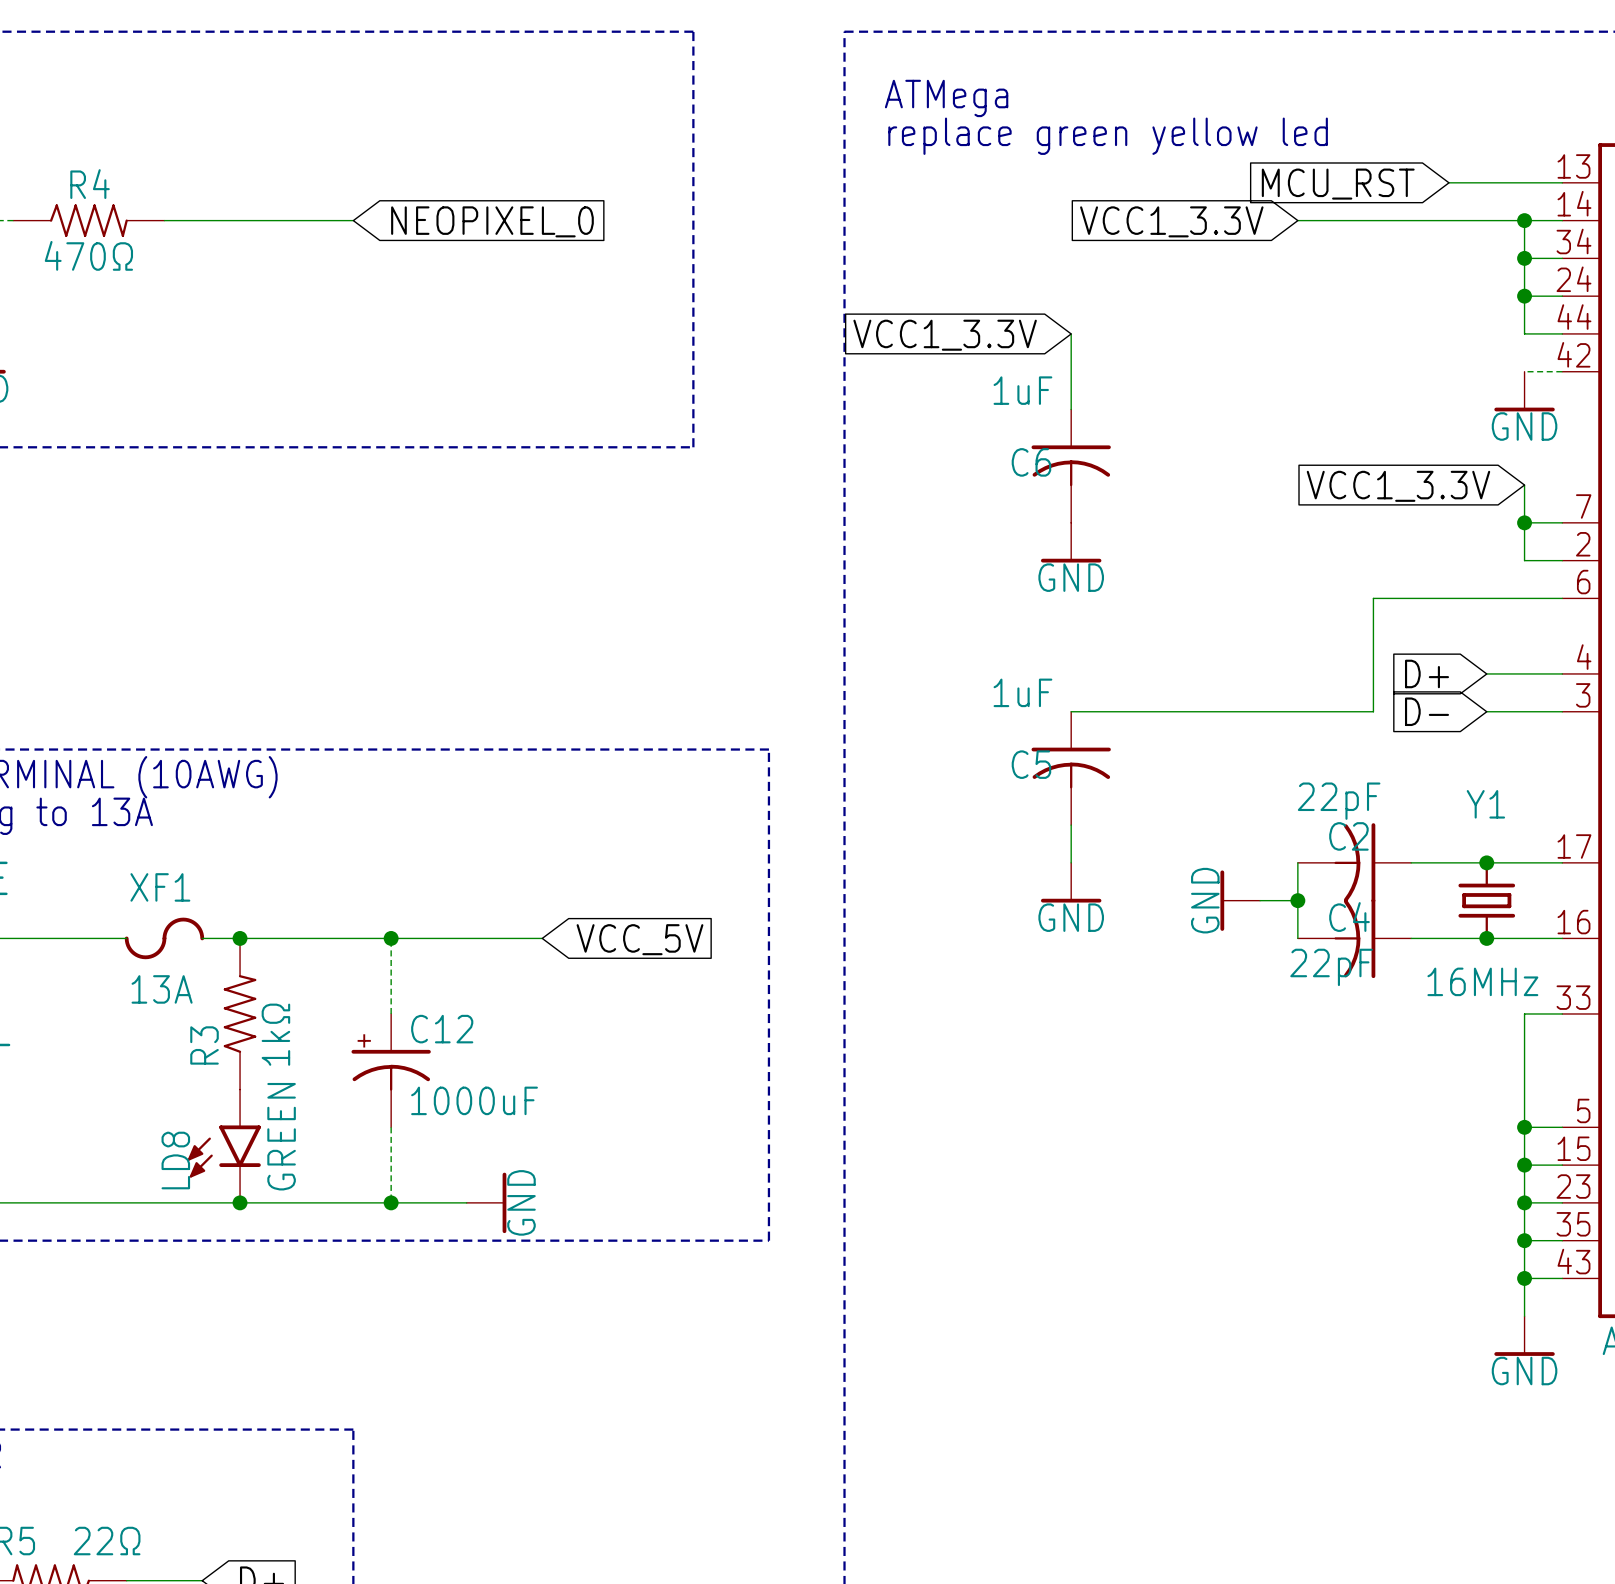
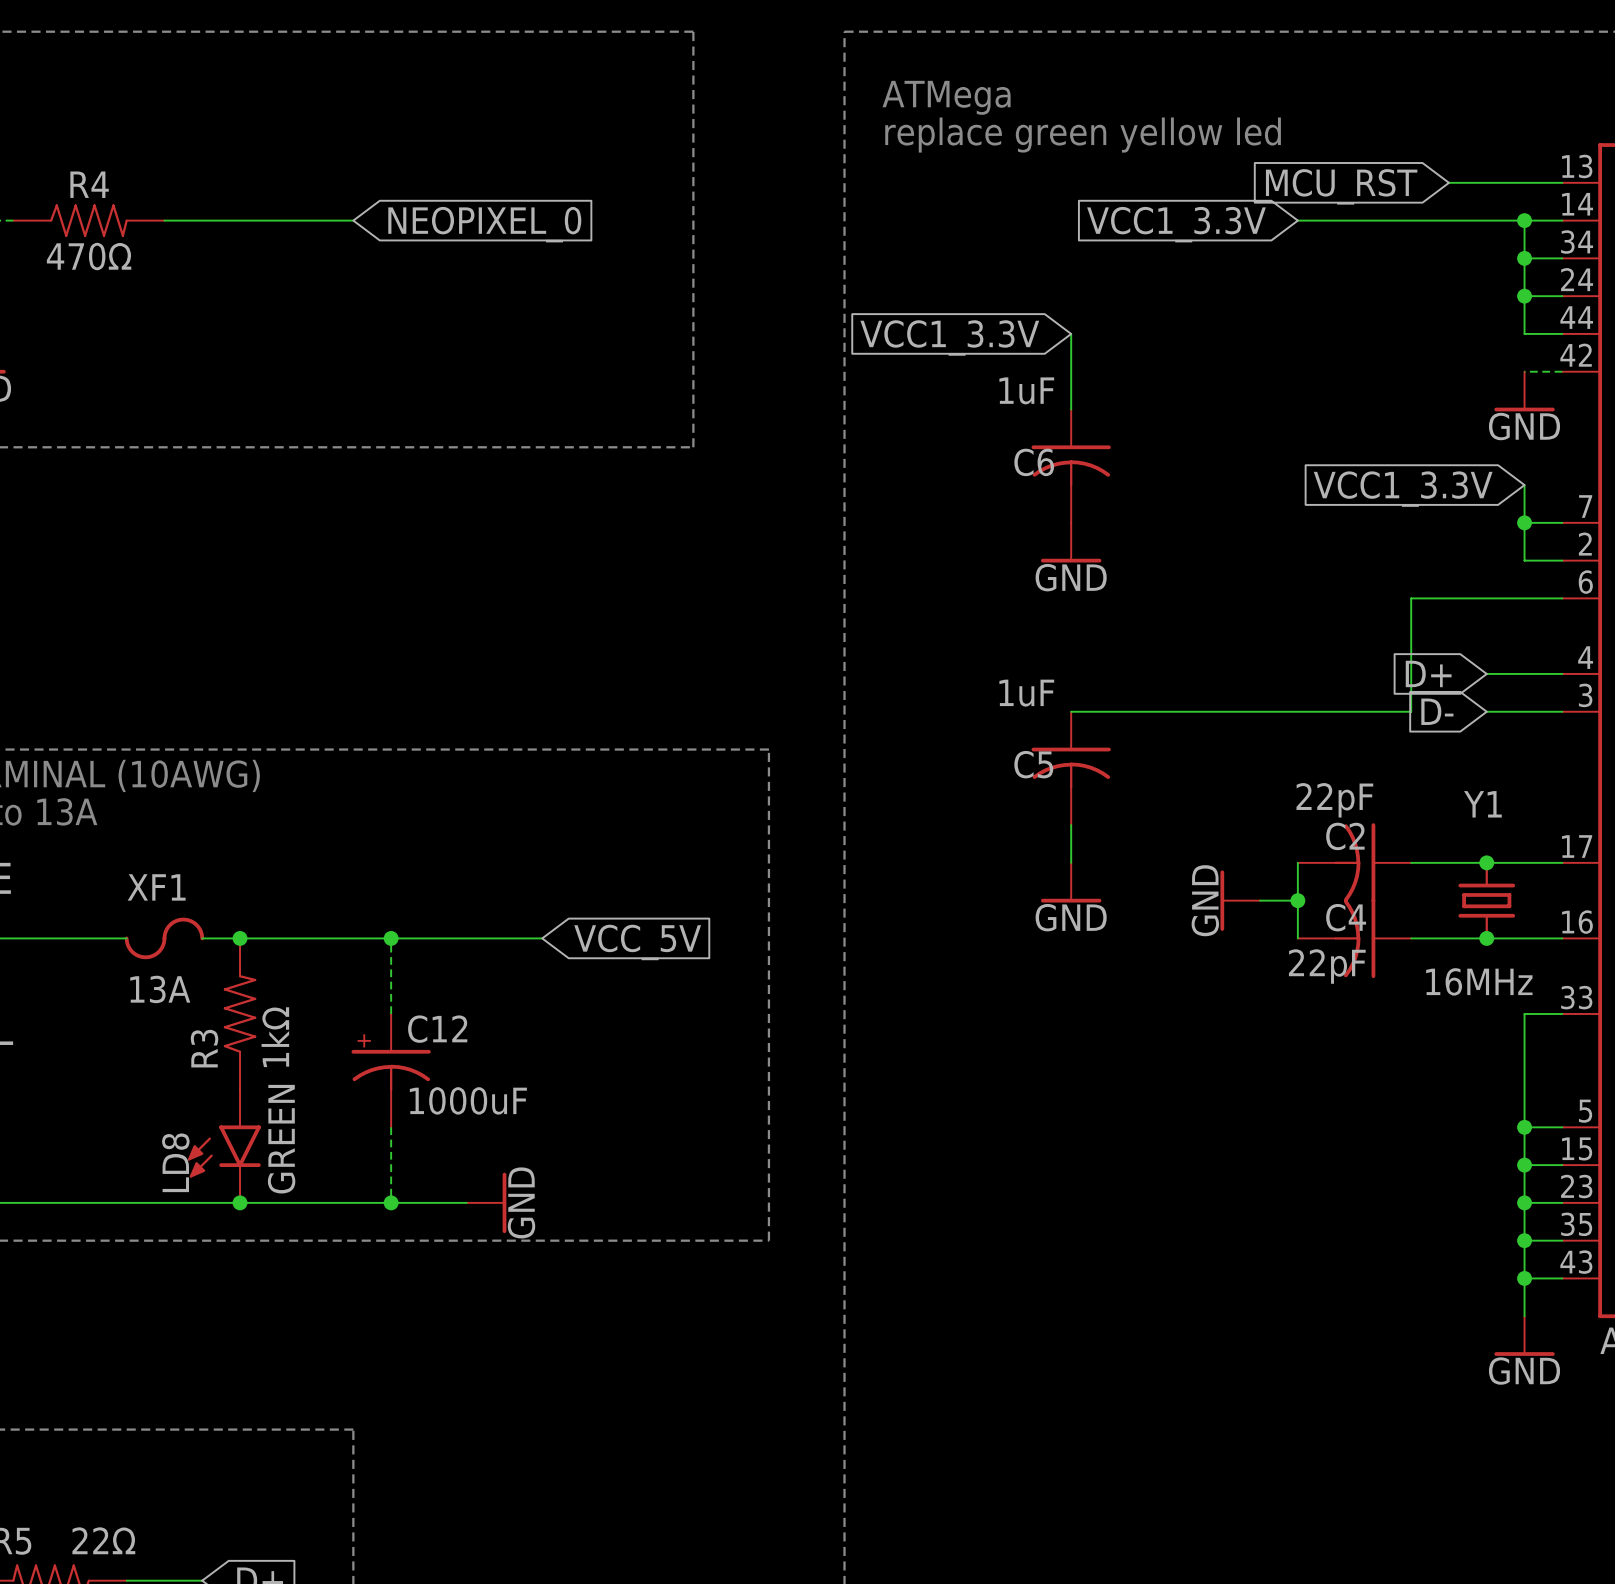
wire: (1411, 598) (1373, 598) (1373, 711) -> (1411, 598) (1411, 711) (1373, 711)

